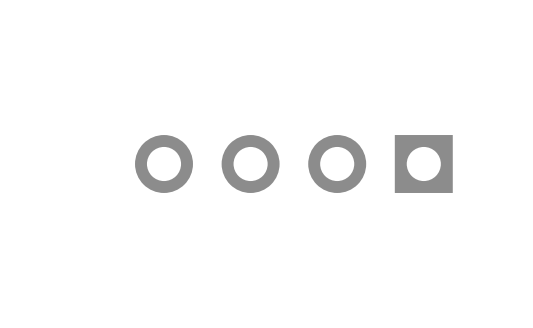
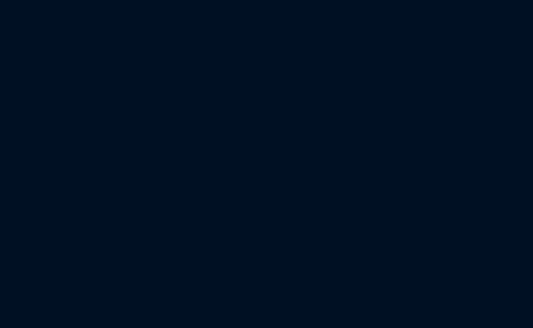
part: (293, 164) -> none

